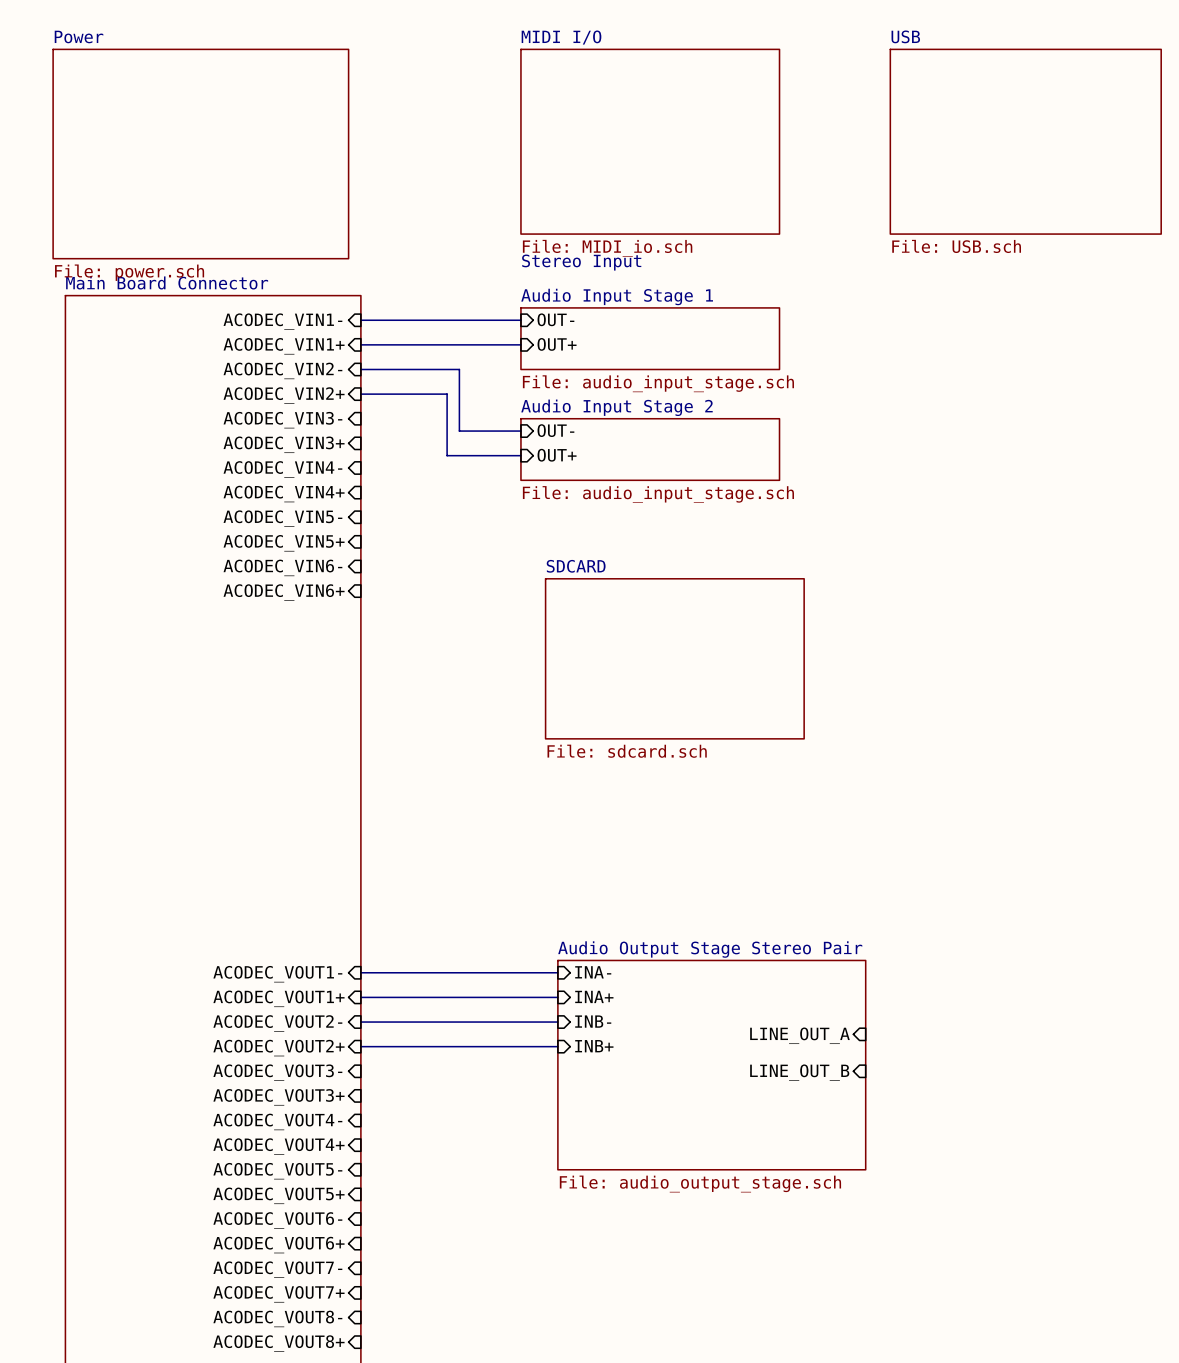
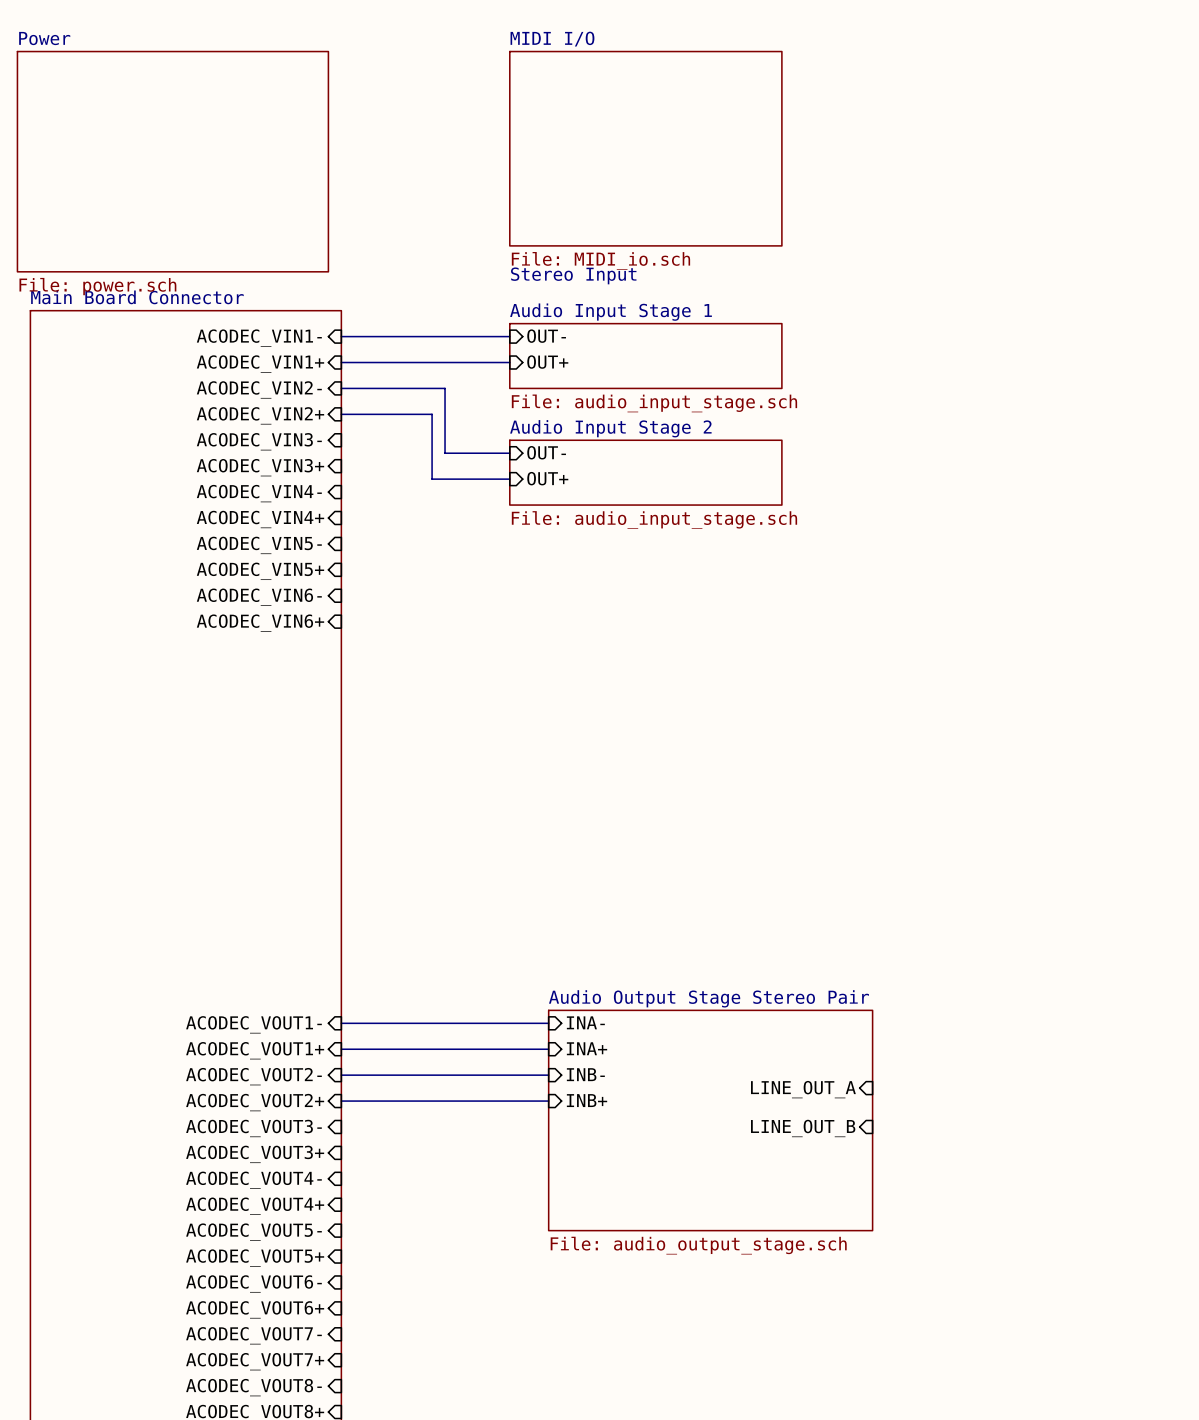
sheet USB: File: USB.sch (1025, 141) -> none
sheet SDCARD: File: sdcard.sch (674, 658) -> none

